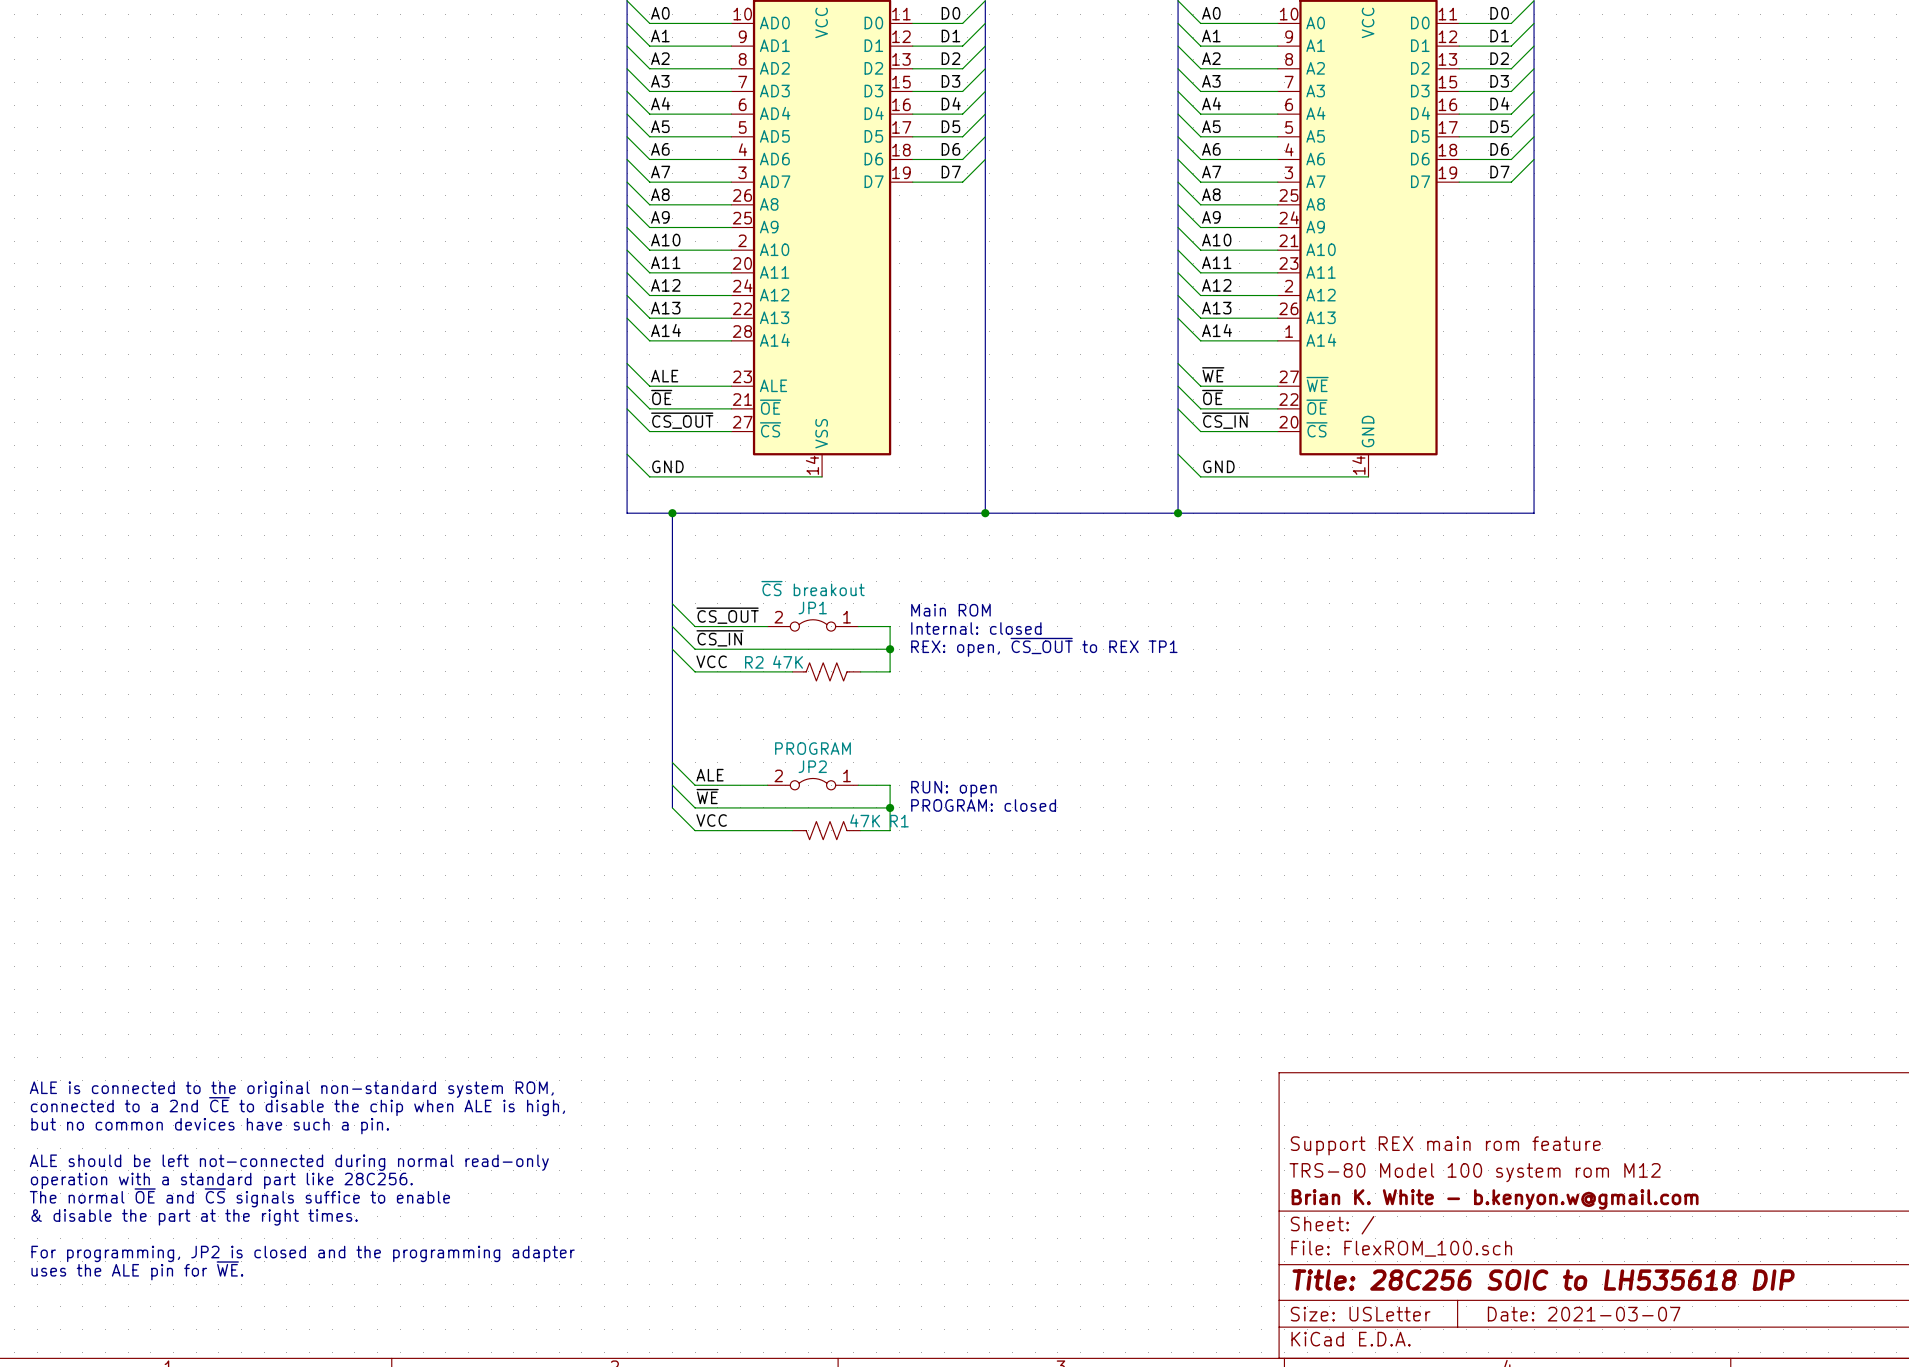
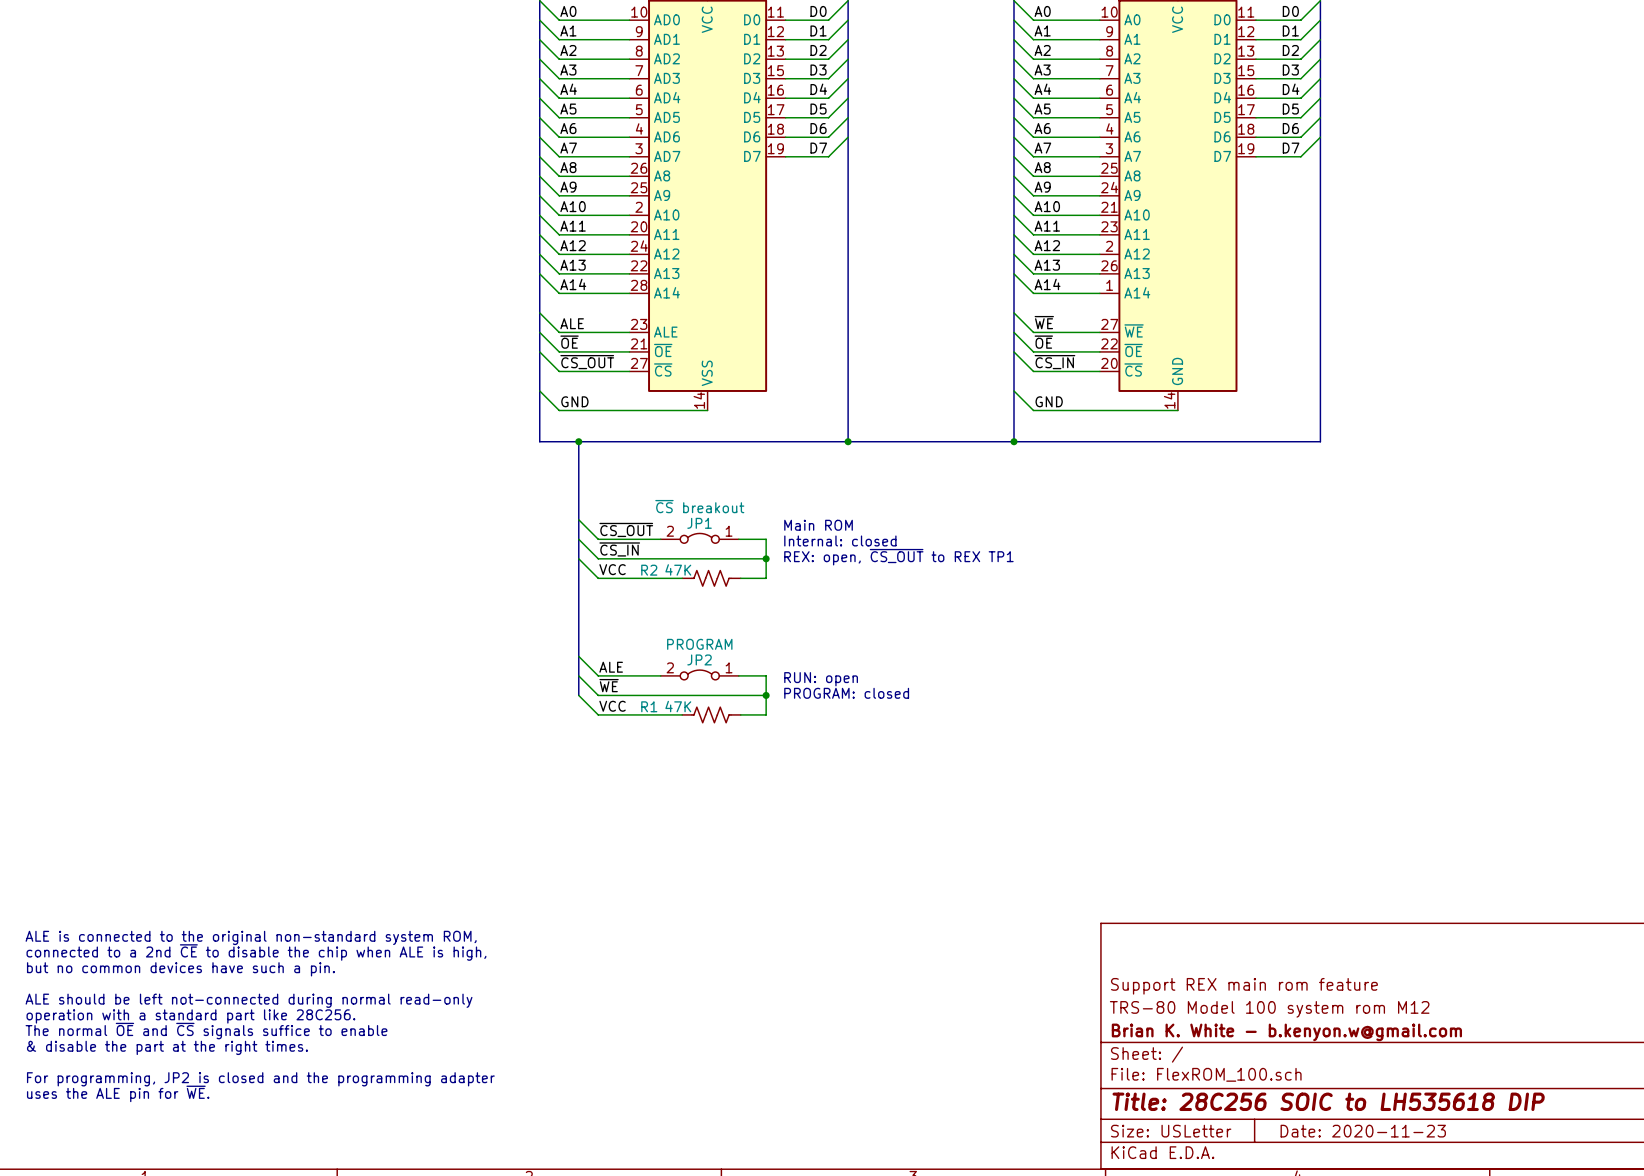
R1 flip: as is (826, 830) -> left-right (711, 714)
title block: Date: 2021-03-07 (1584, 1314) -> Date: 2020-11-23 (1363, 1131)

